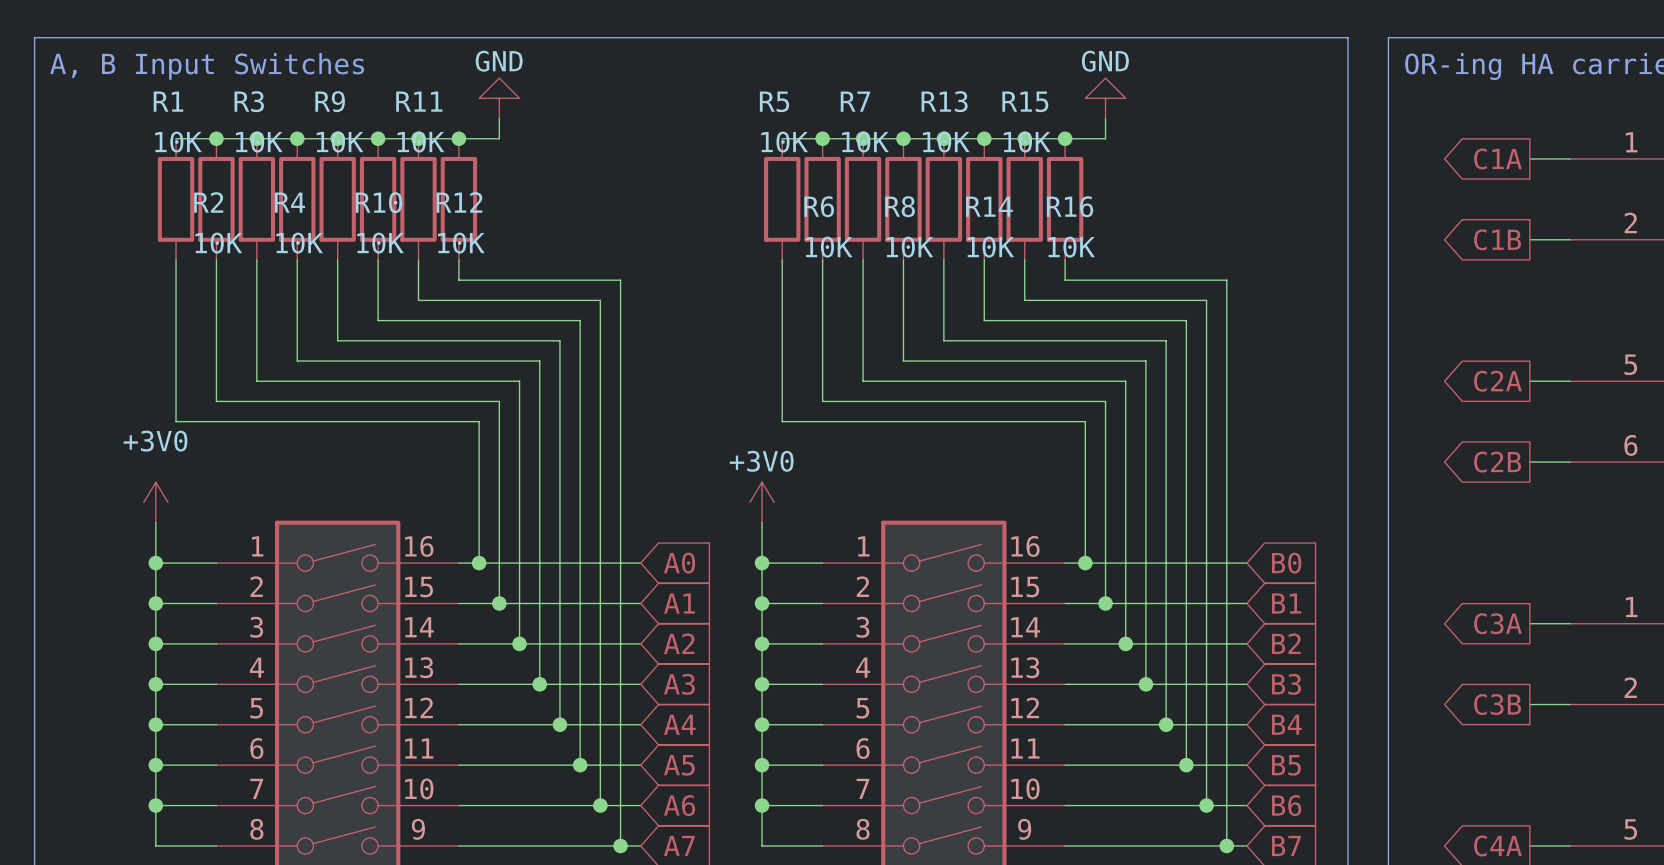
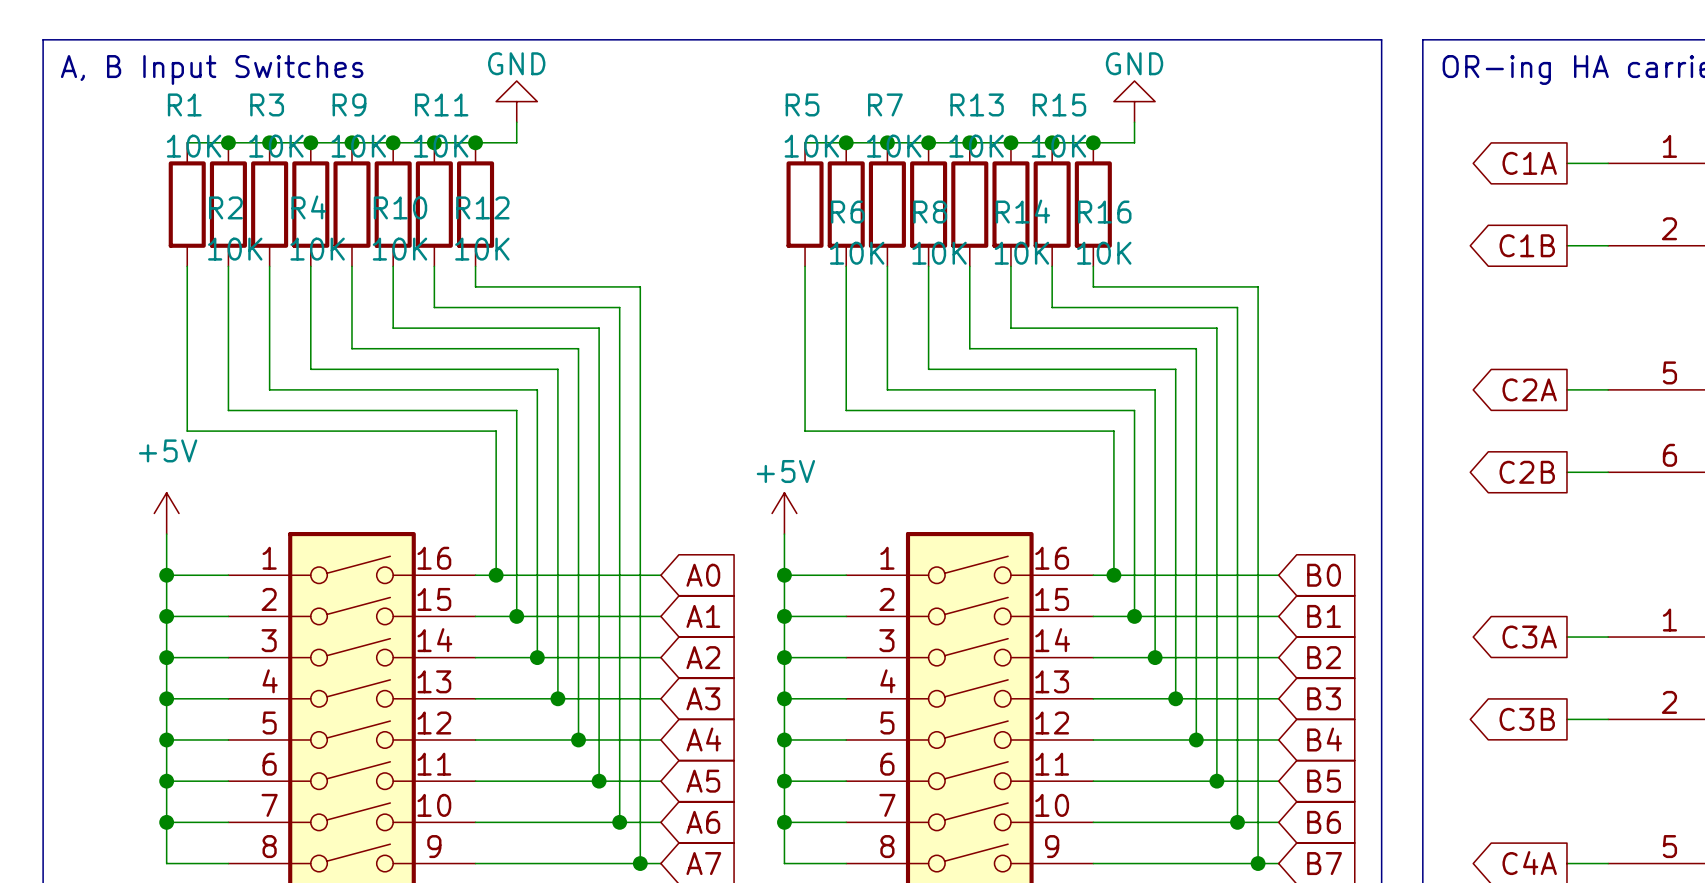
power symbol: +3V0 (155, 502) -> +5V (166, 513)
power symbol: +3V0 (762, 502) -> +5V (784, 513)

